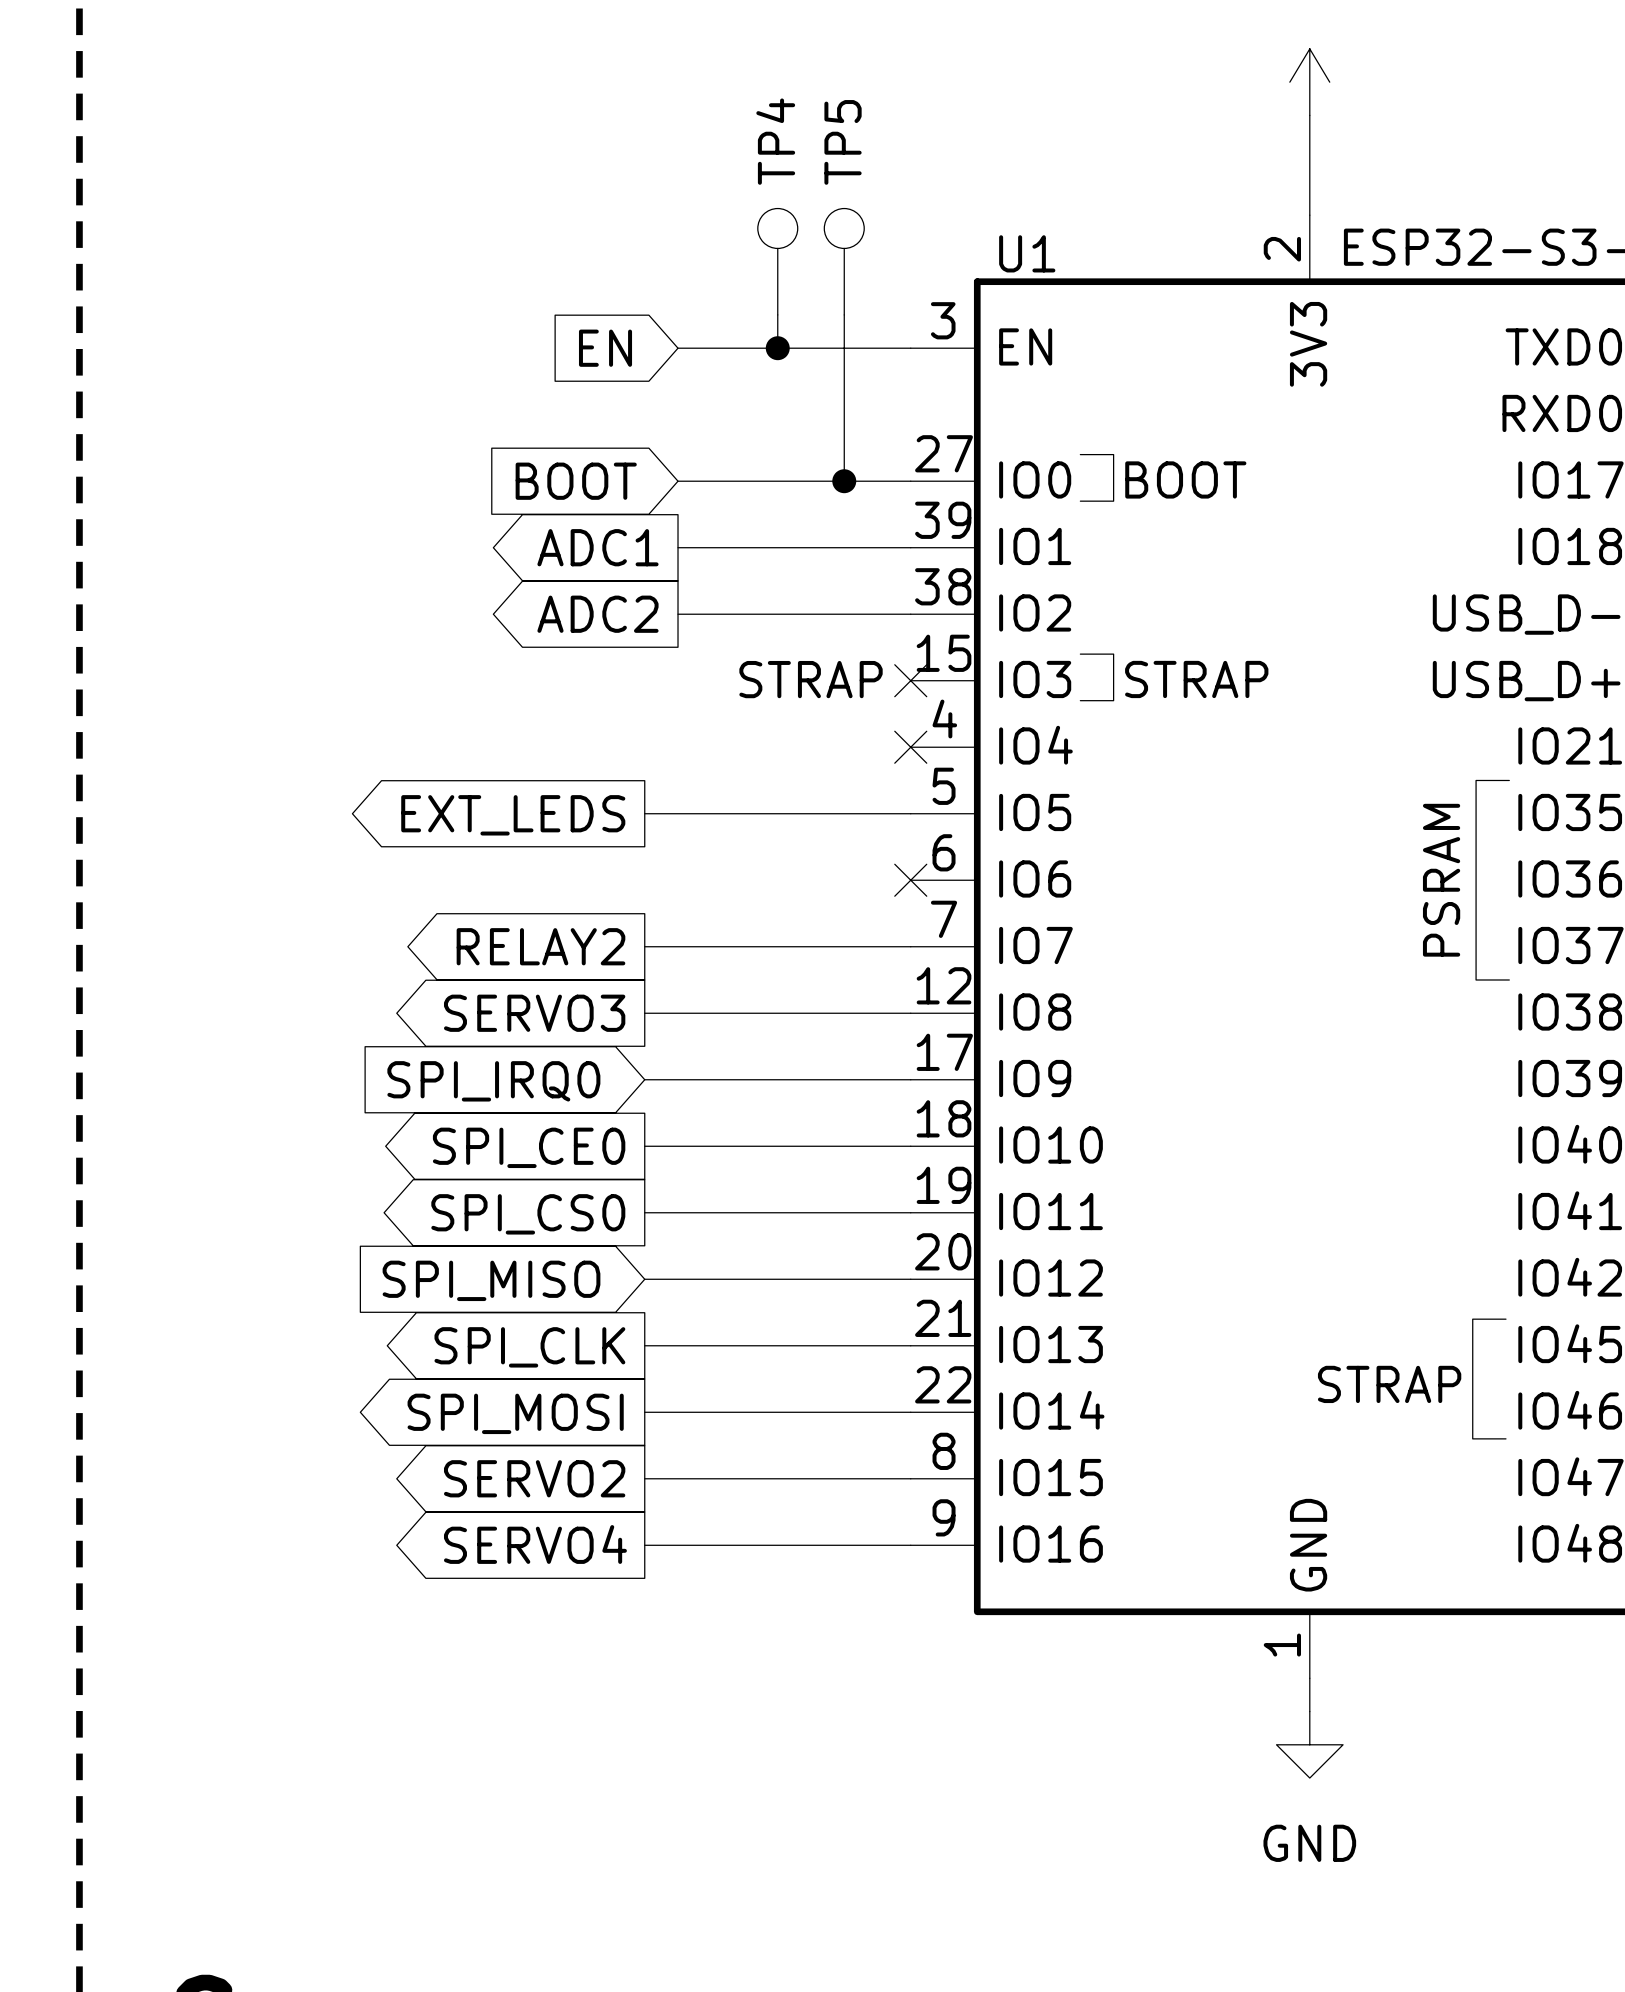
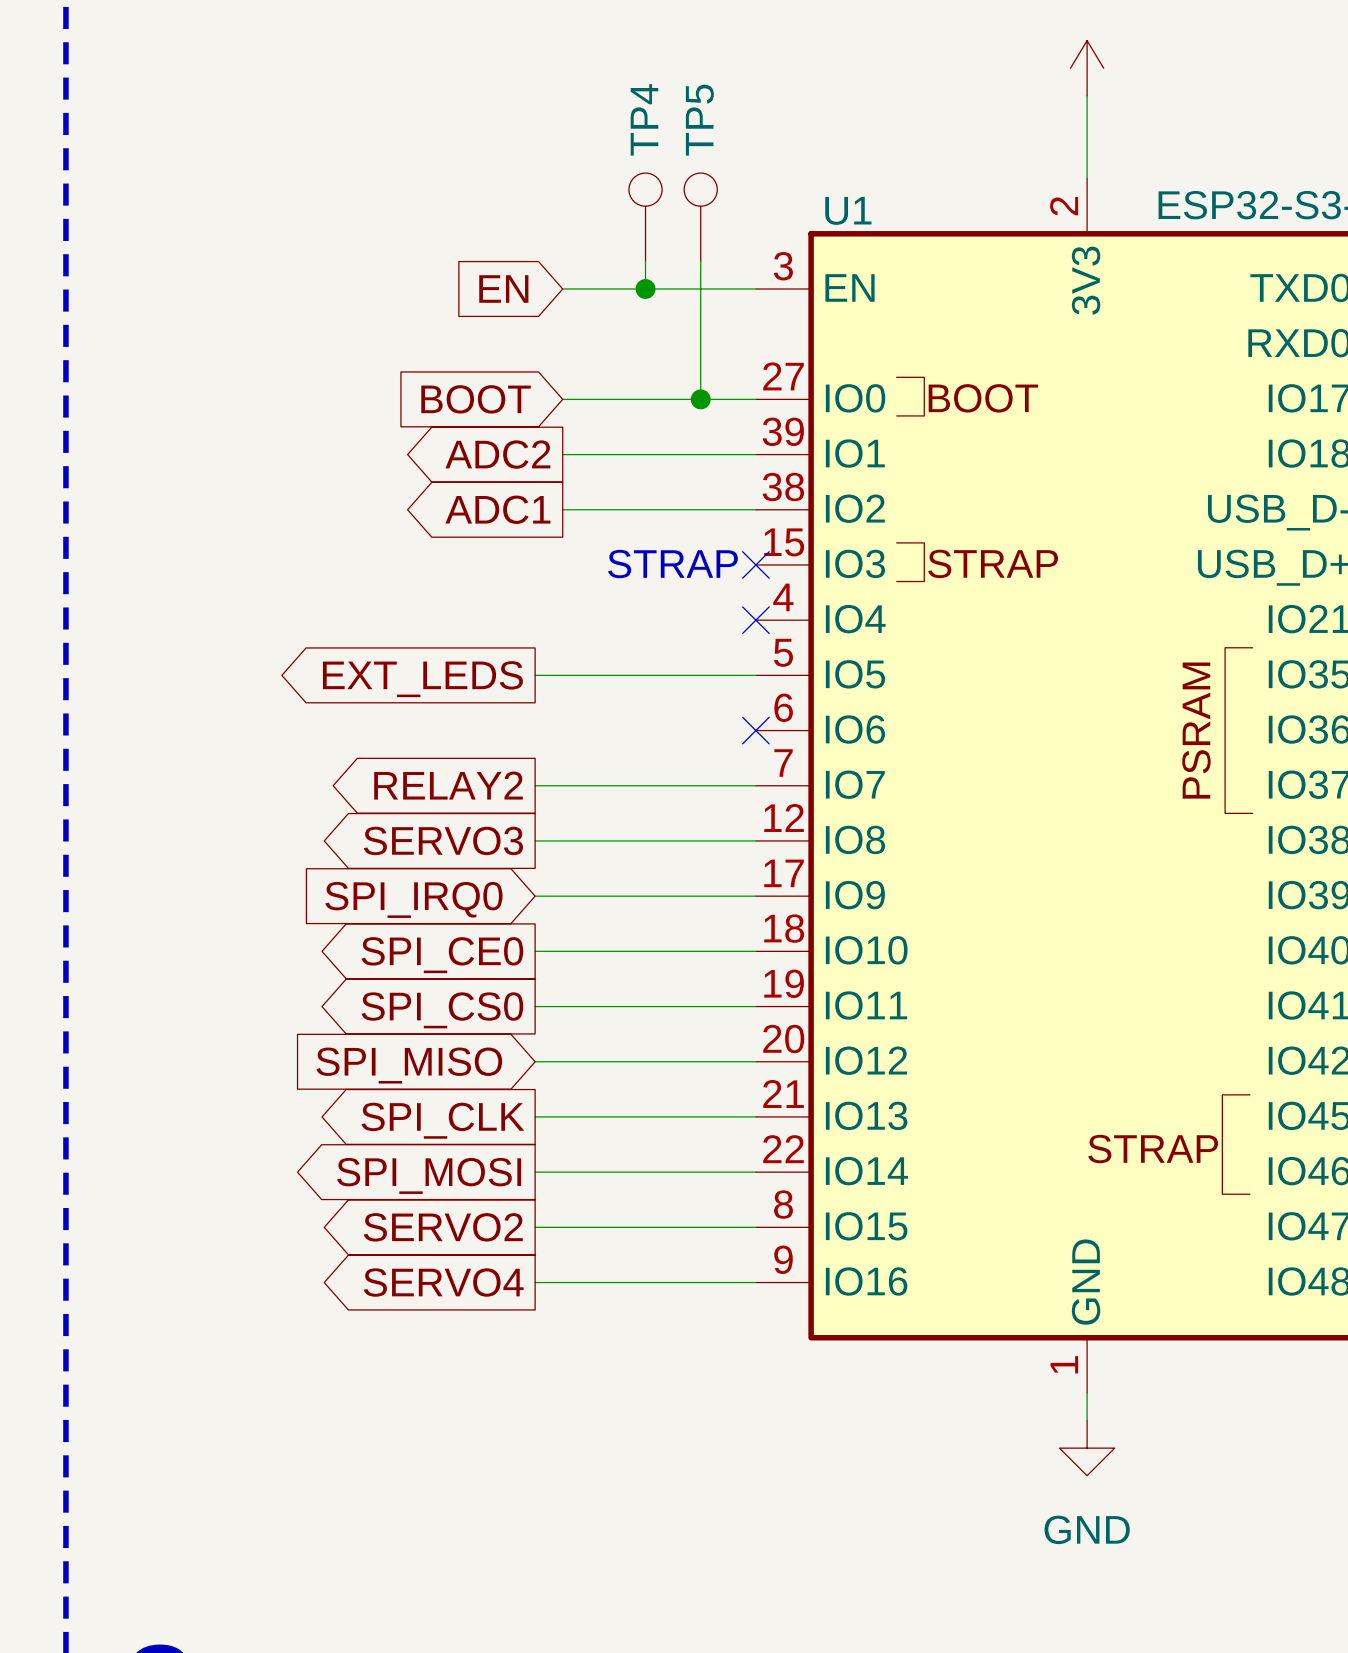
global label: ADC1 (597, 547) -> ADC2 (497, 454)
global label: ADC2 (597, 614) -> ADC1 (497, 509)

